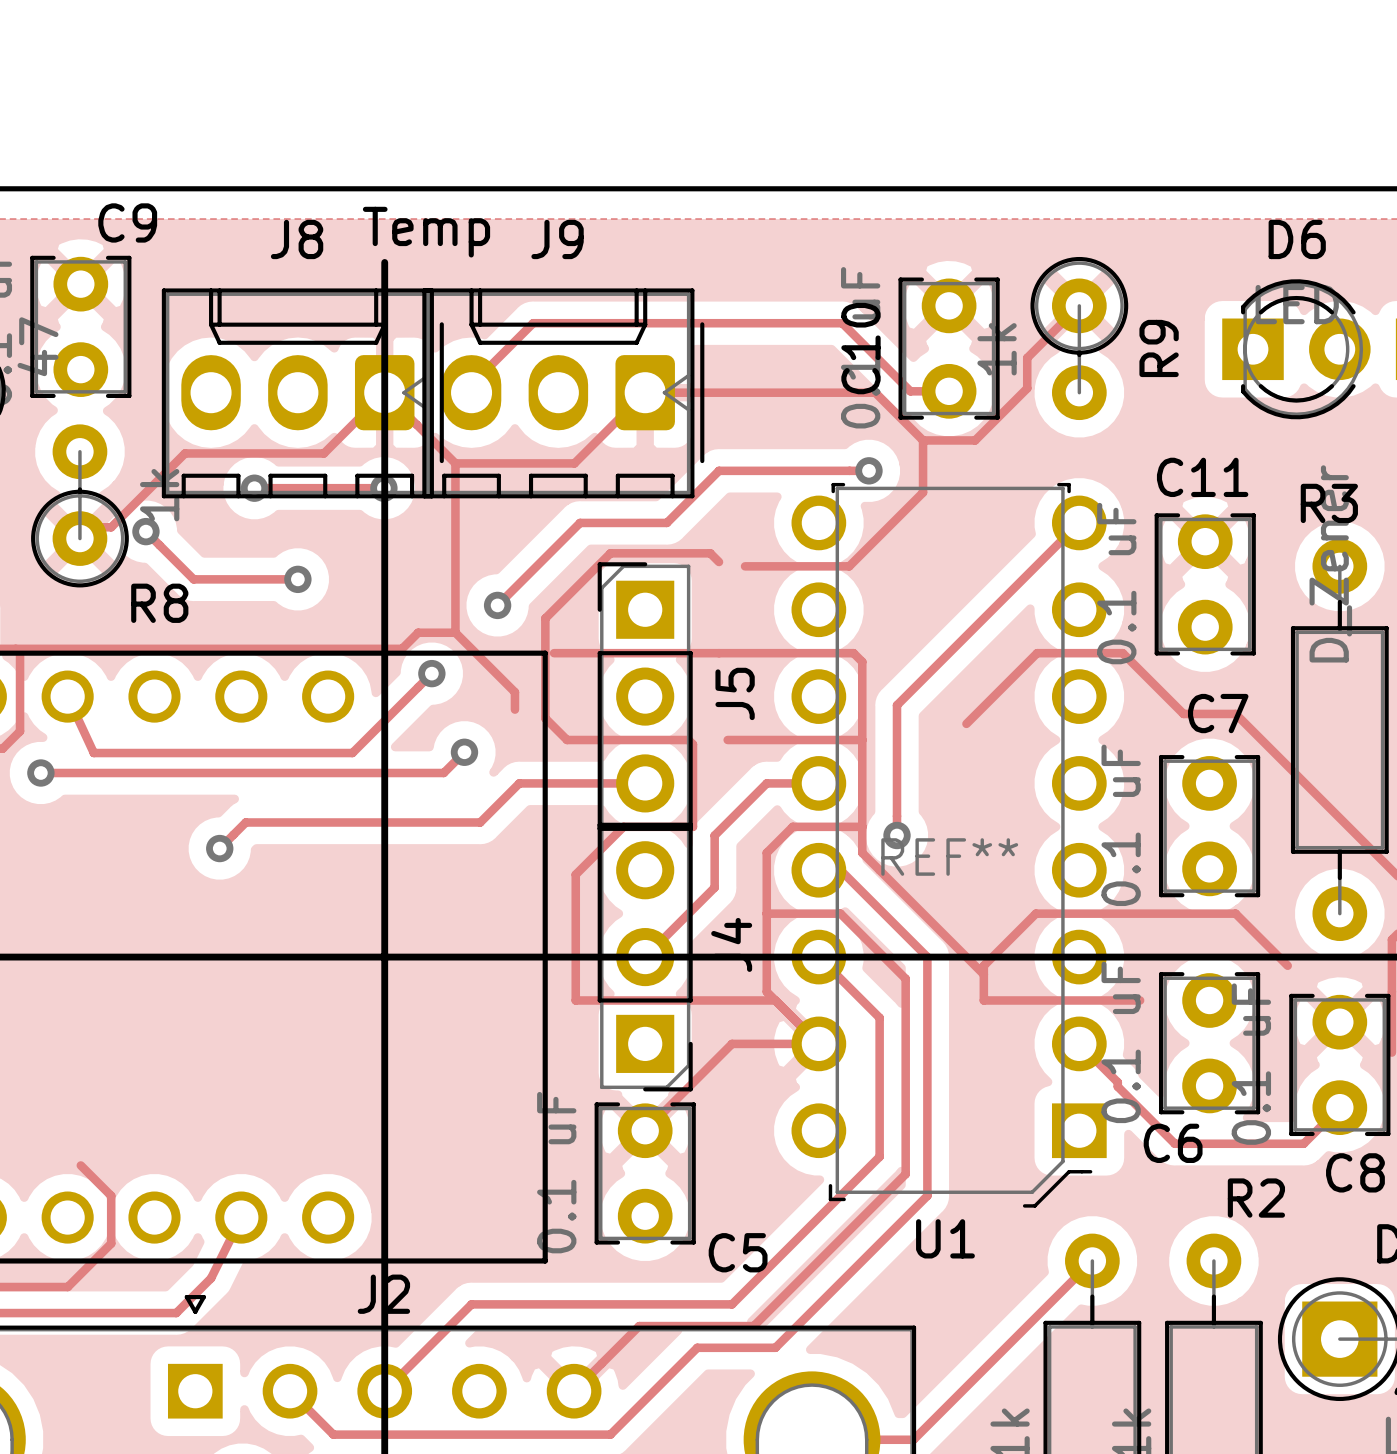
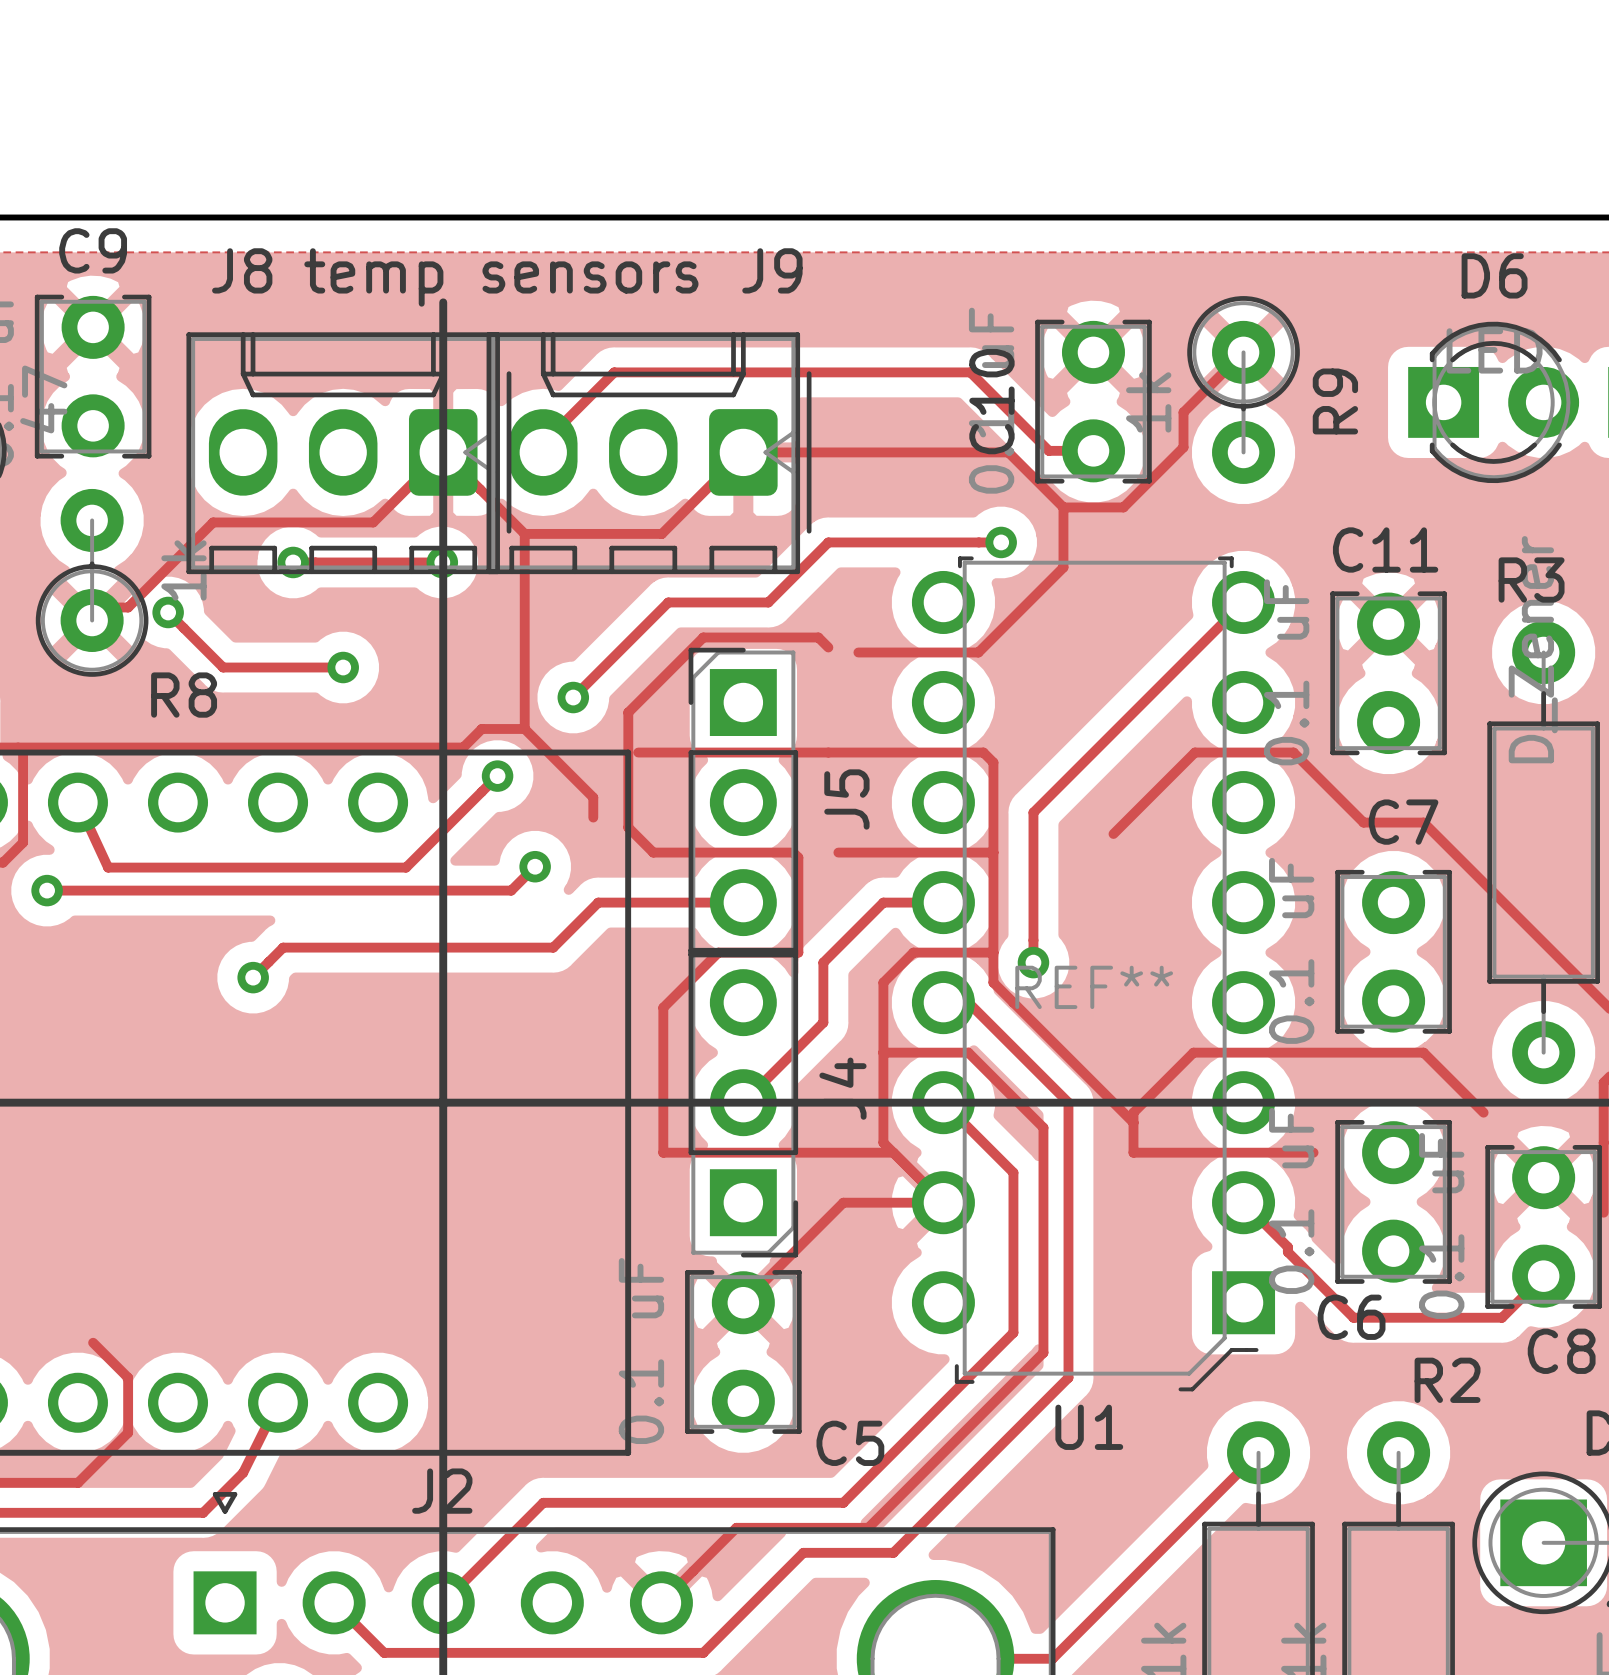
C9 name position: C9 (127, 222) -> C9 (93, 250)
text: Temp (426, 232) -> temp sensors (501, 277)
J8 name position: J8 (297, 239) -> J8 (242, 270)
J9 name position: J9 (557, 239) -> J9 (772, 270)

